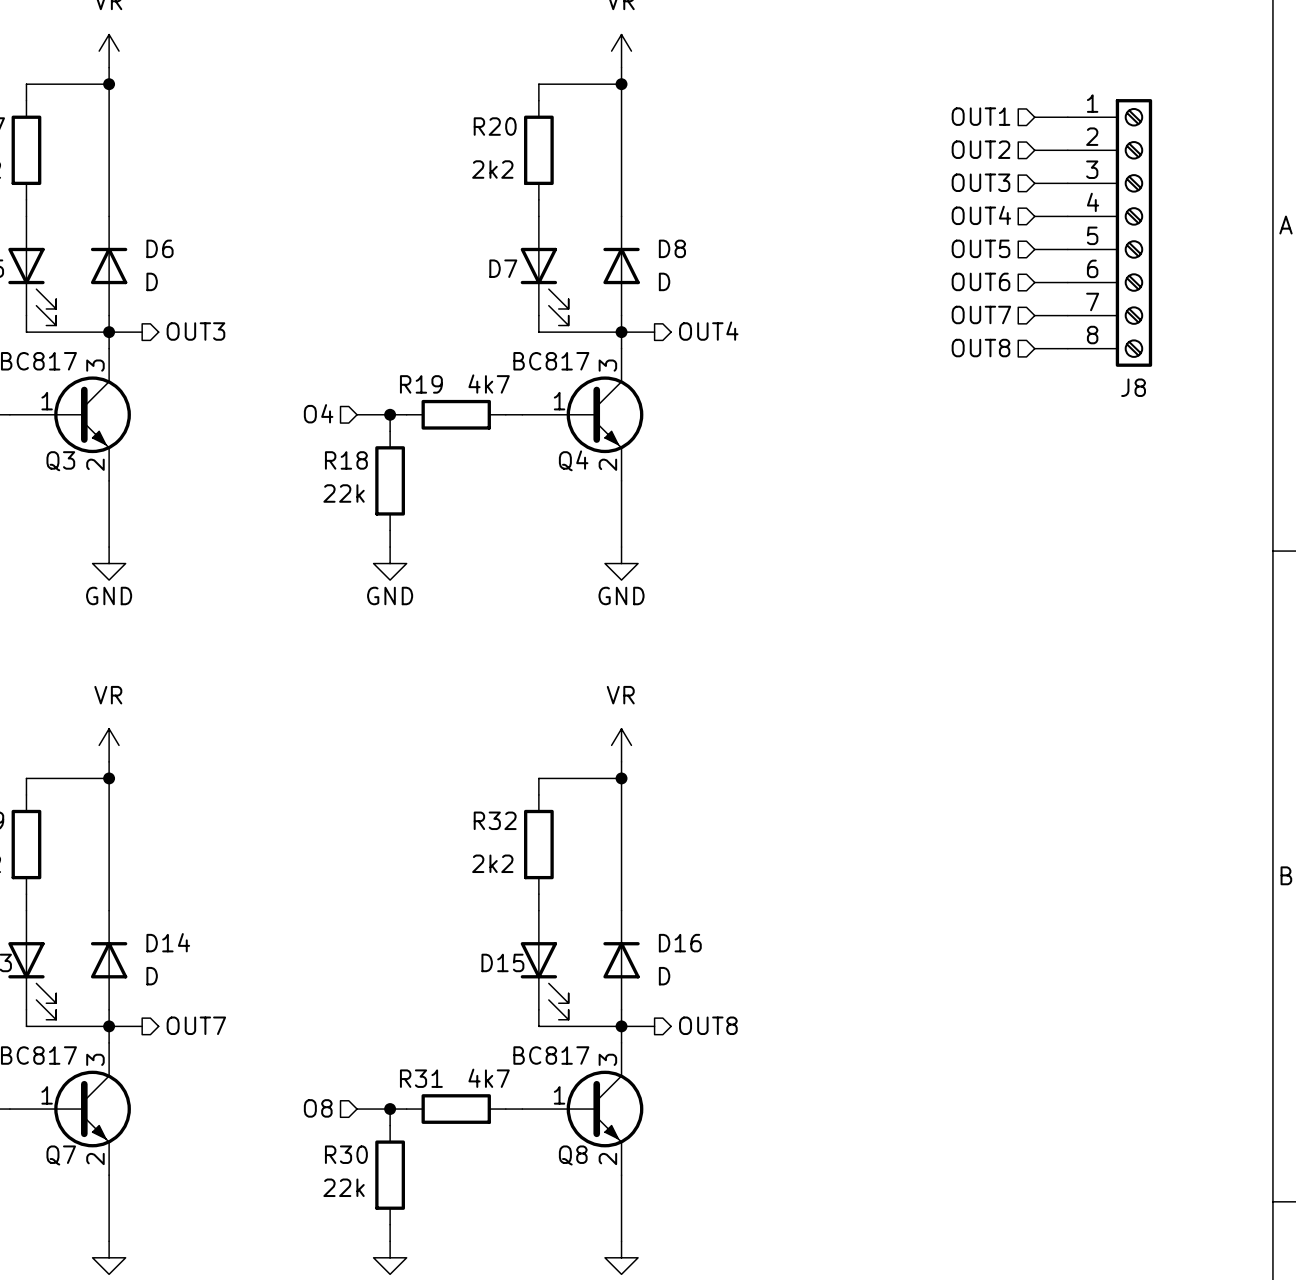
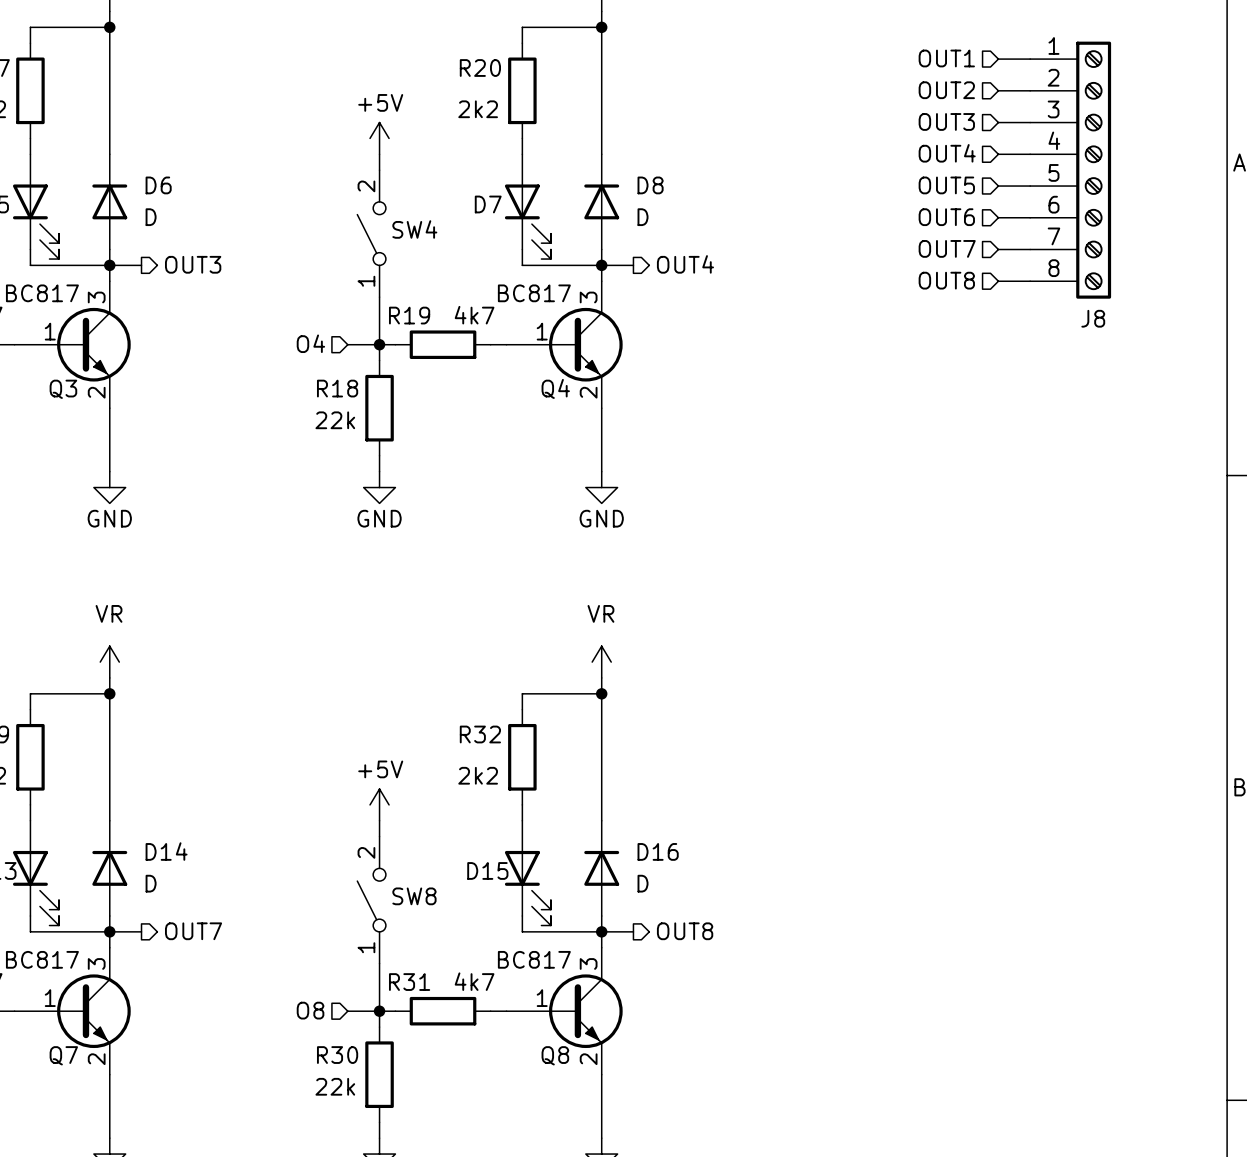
power symbol: none -> +5V (379, 138)
wire: none -> (379, 154) (379, 170)
SW4: none -> (371, 233)
wire: none -> (379, 297) (379, 344)
power symbol: none -> +5V (379, 804)
wire: none -> (379, 820) (379, 836)
SW8: none -> (371, 900)
wire: none -> (379, 963) (379, 1011)

